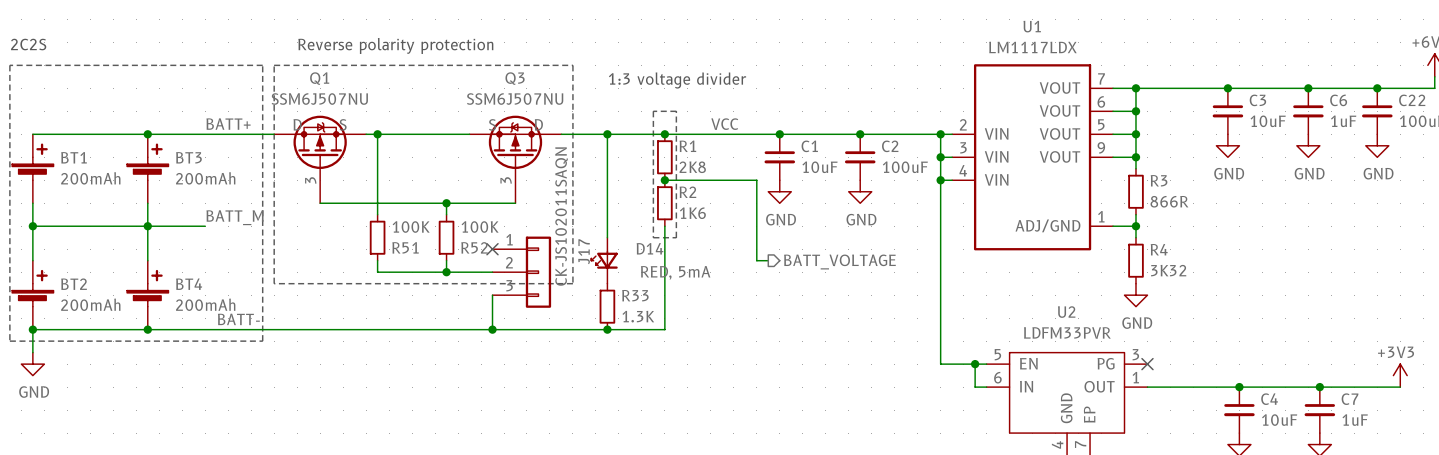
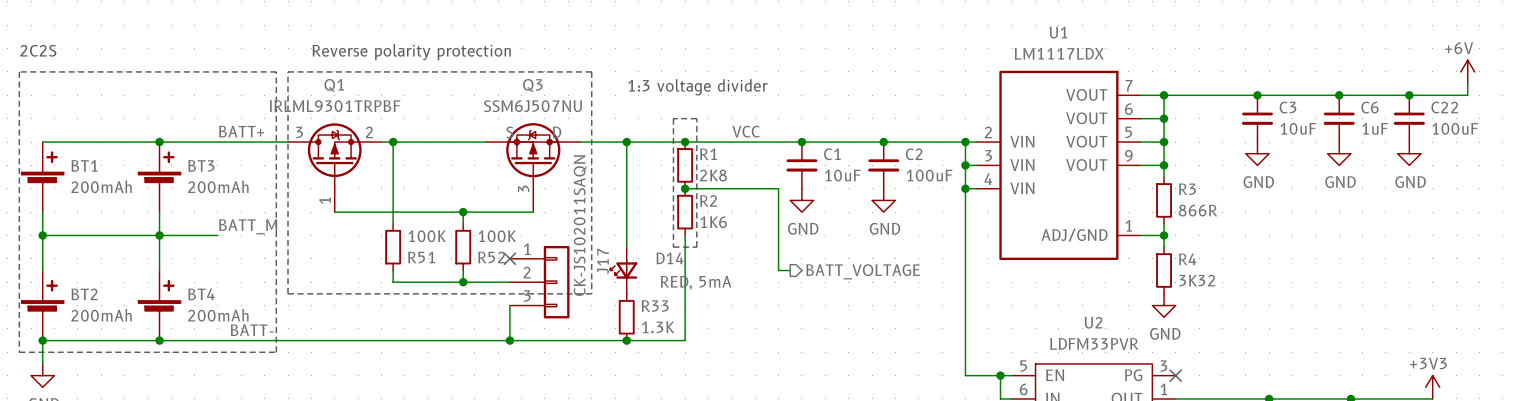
Q1 text: SSM6J507NU (319, 99) -> none
Q1 value: none -> IRLML9301TRPBF (335, 106)
Q1 symbol: [274, 115, 367, 204] -> [288, 123, 382, 213]

